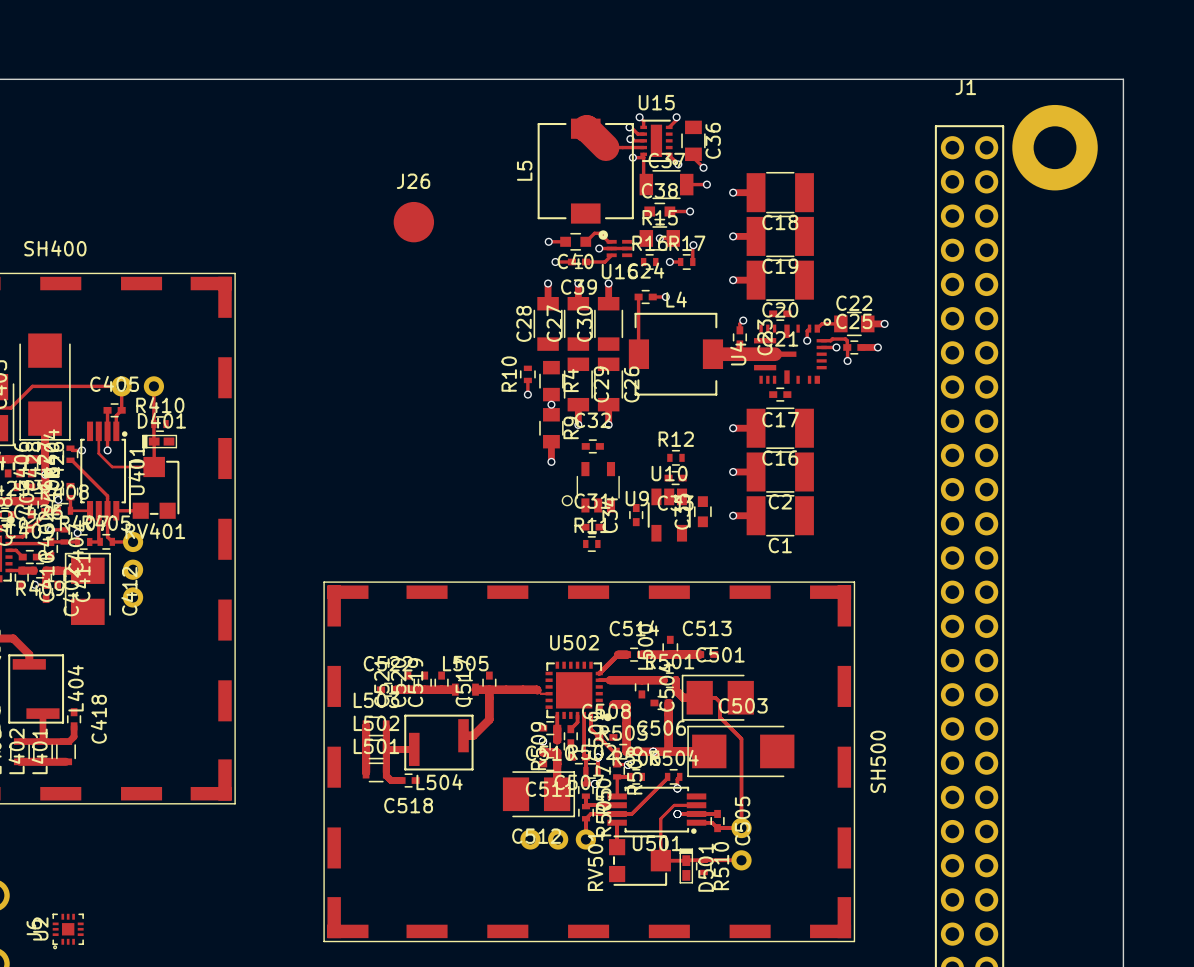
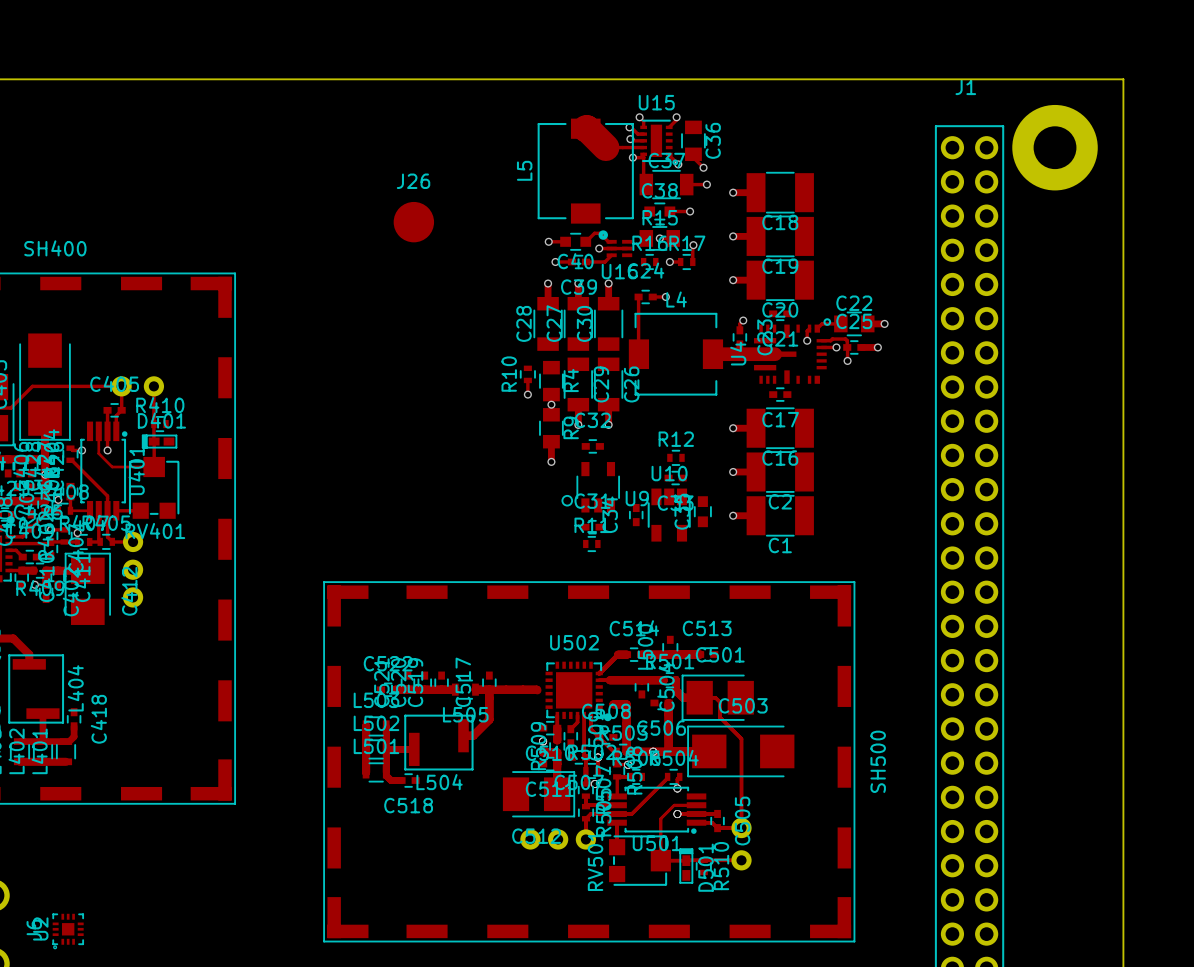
L505 name position: L505 (465, 663) -> L505 (465, 714)
track: (537, 690) (540, 693) (549, 693) -> none

